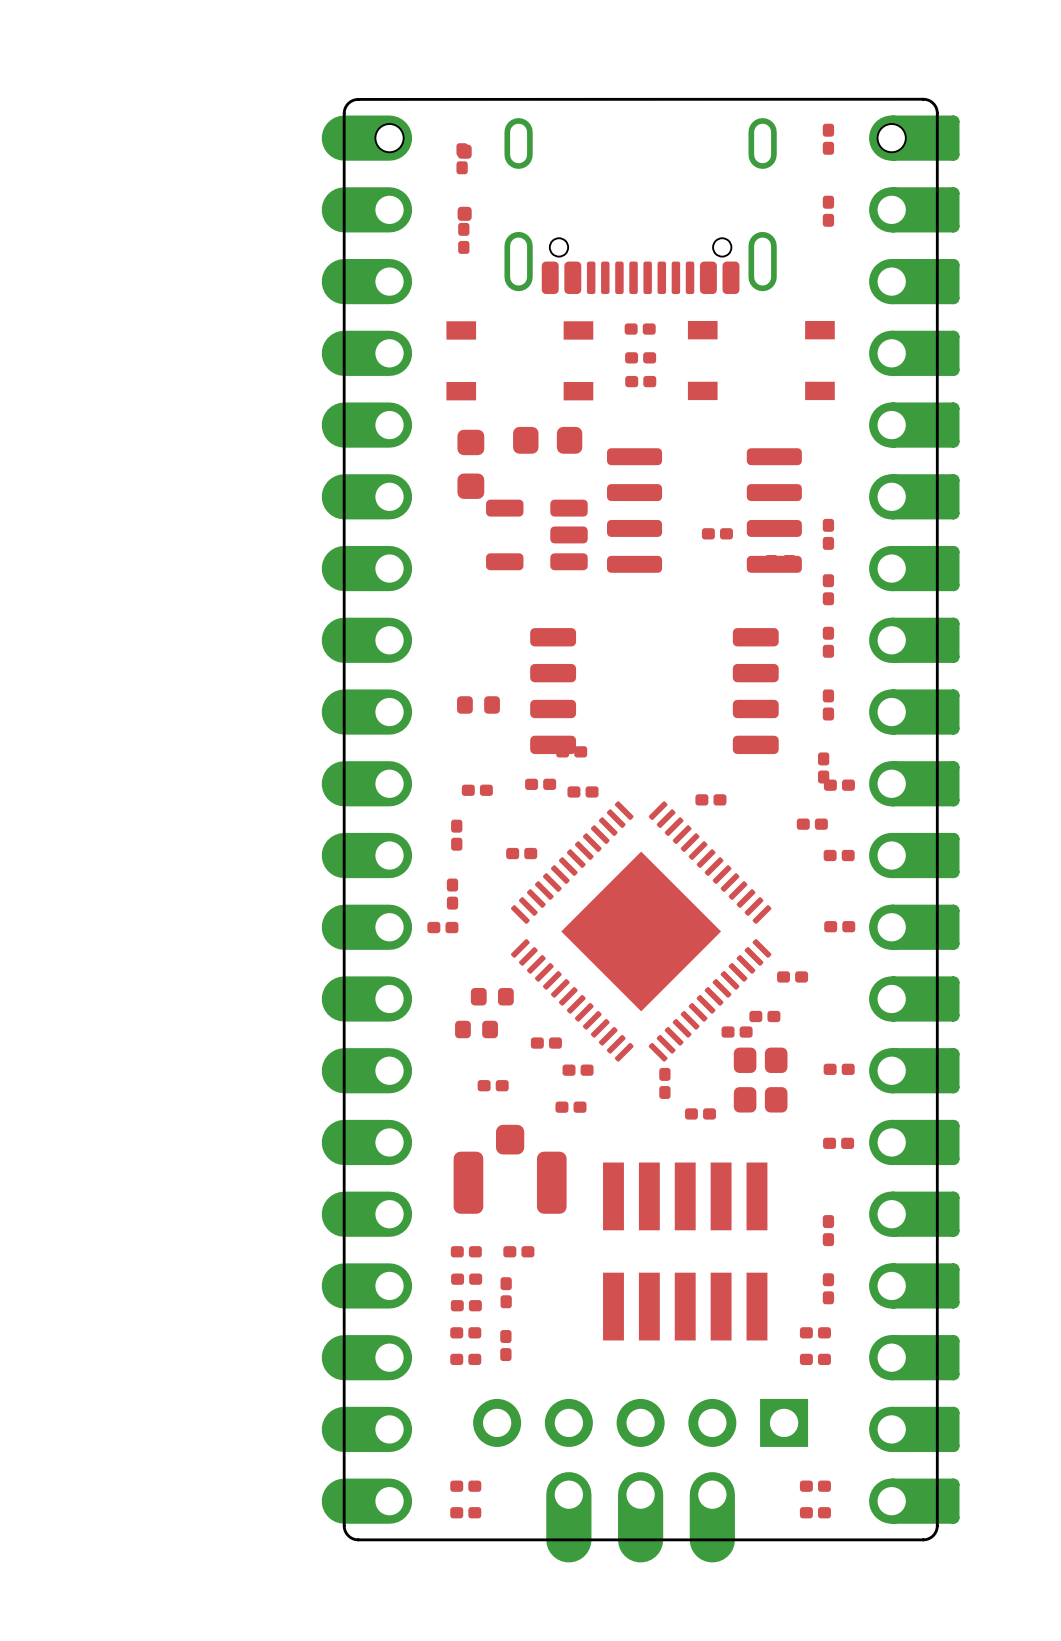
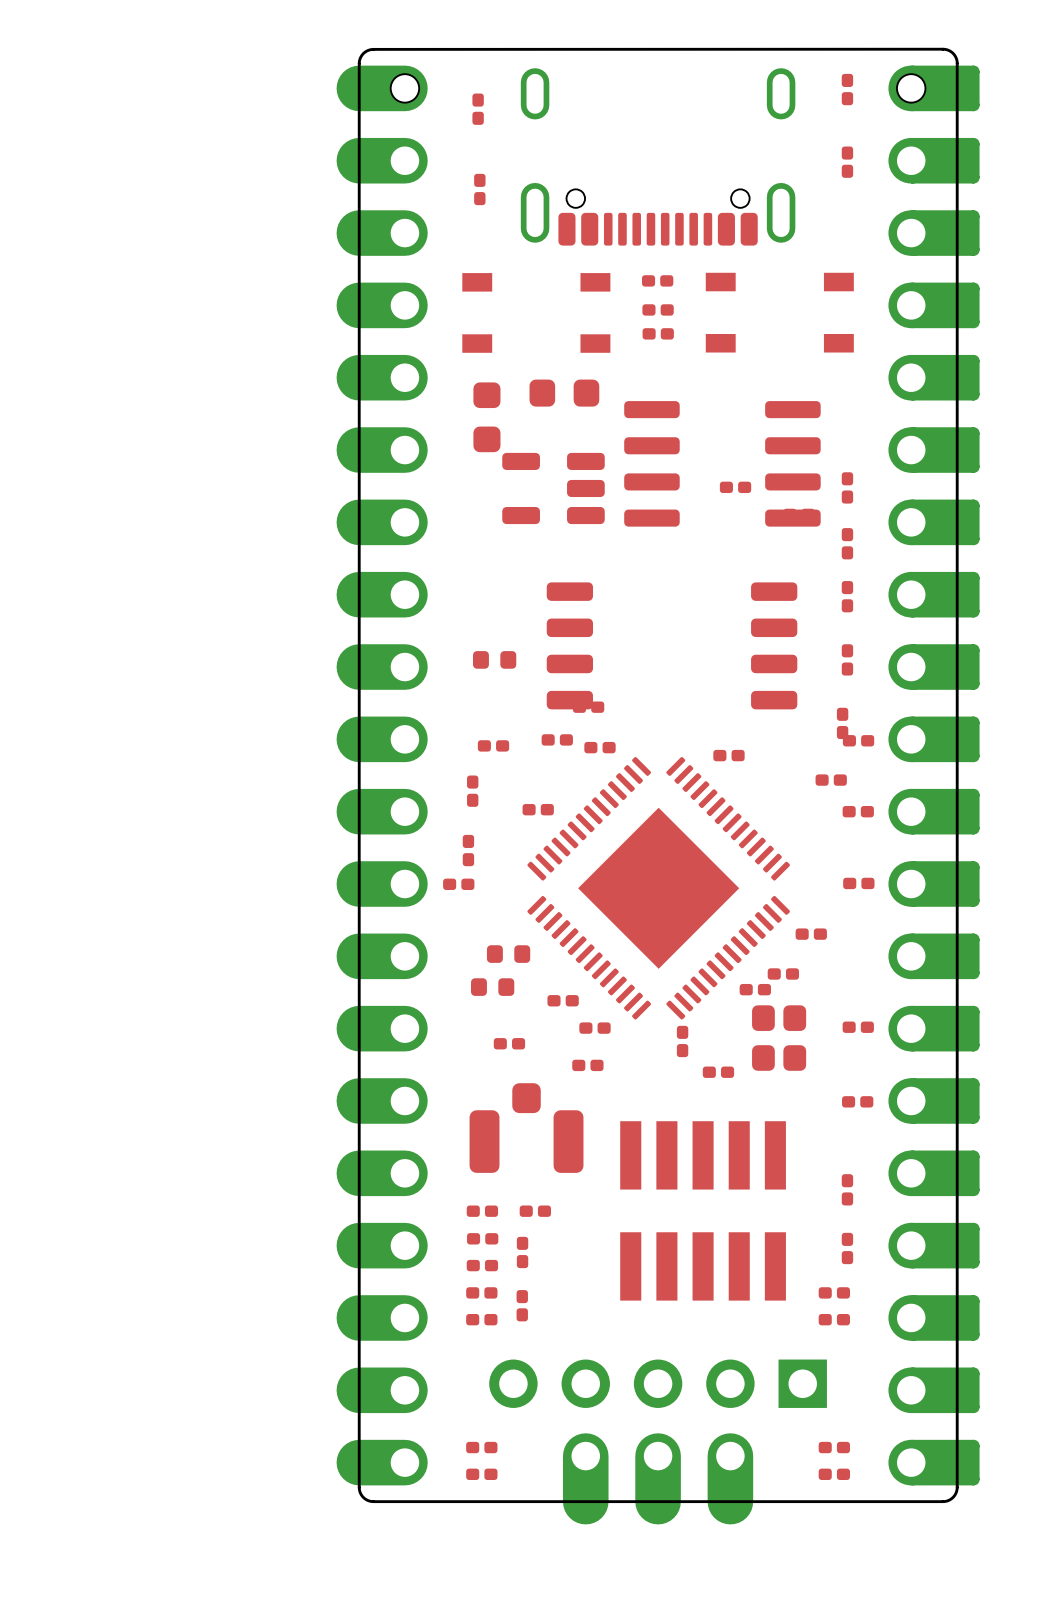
part: (464, 182) -> none

